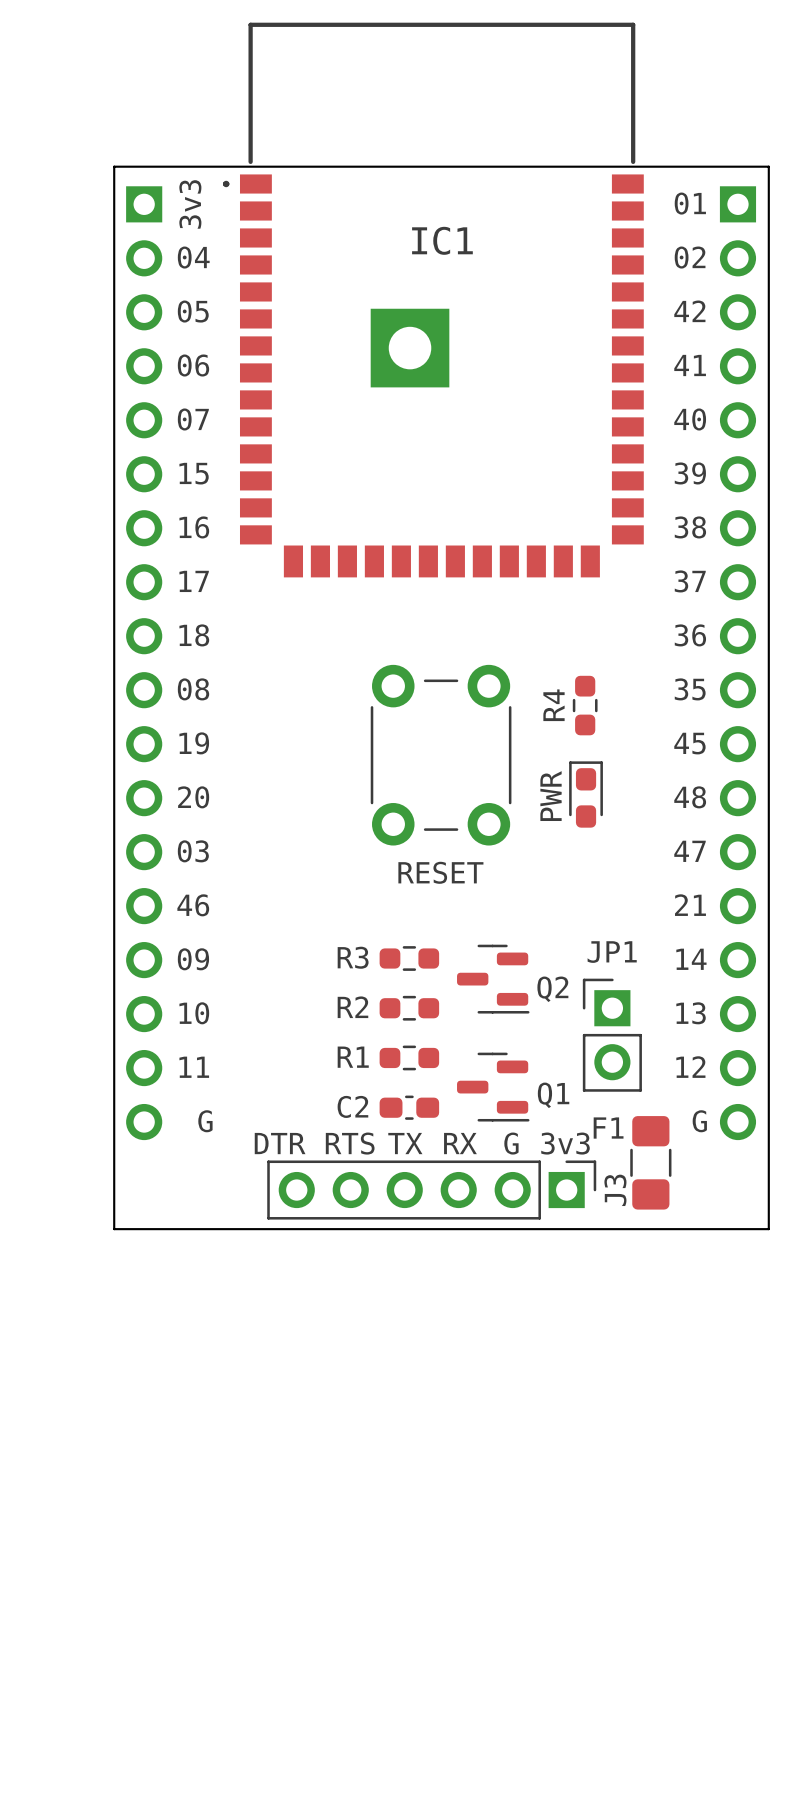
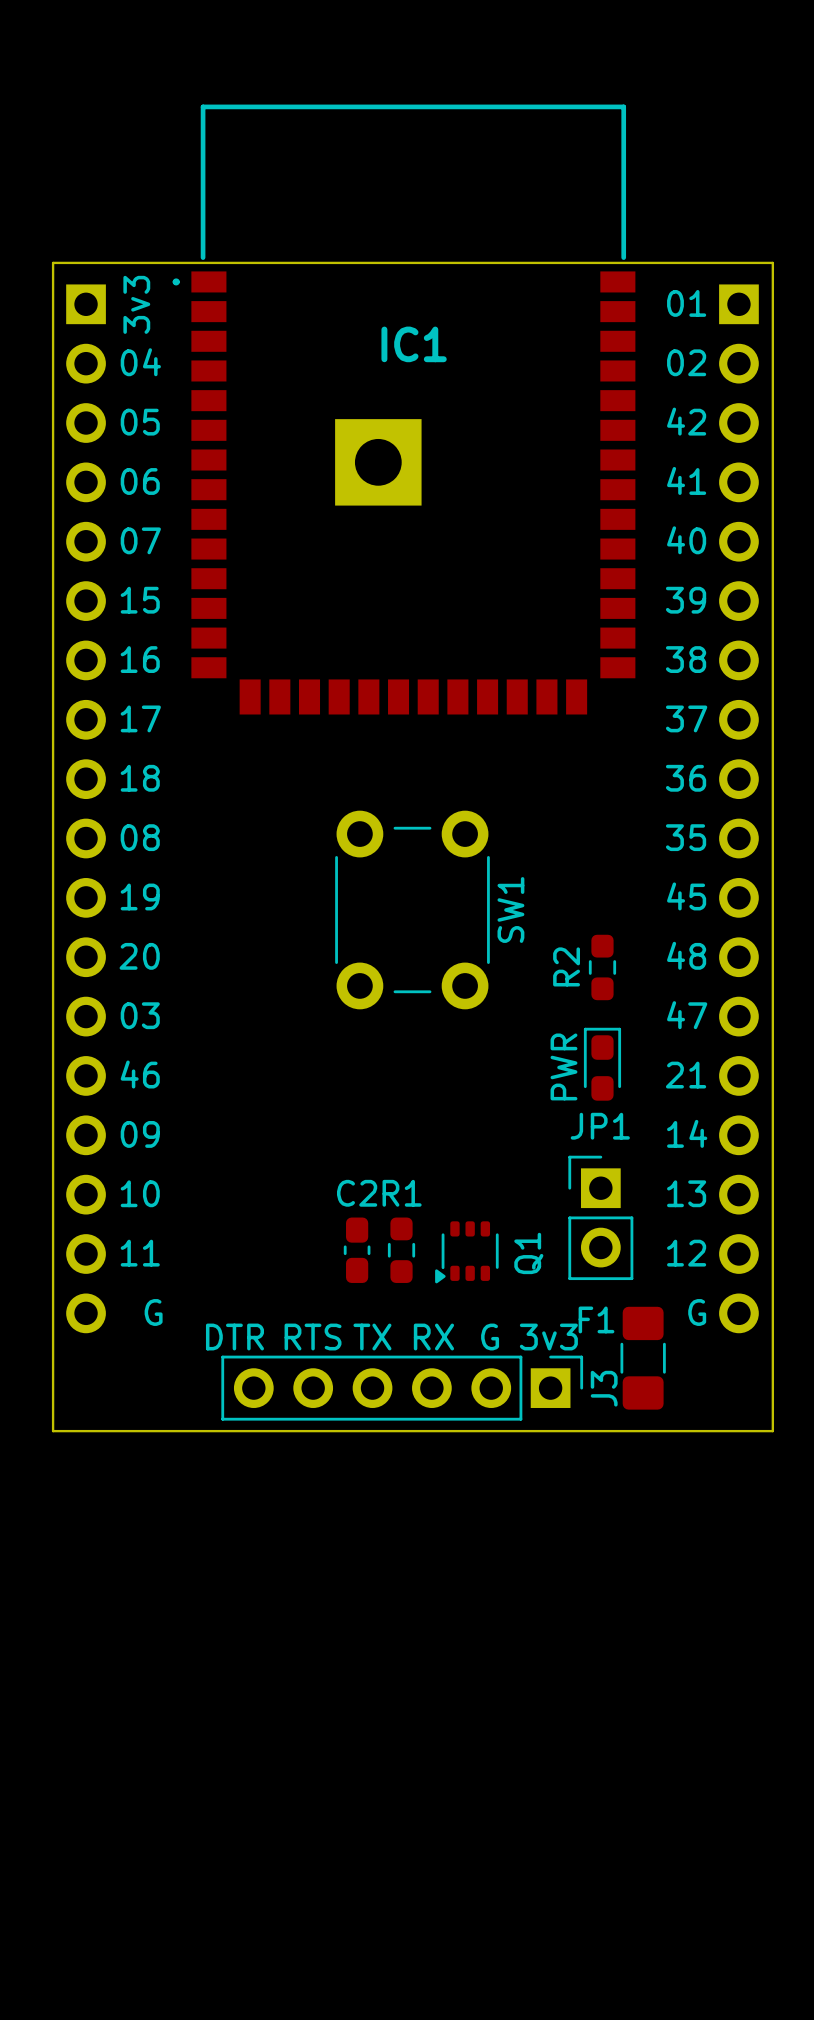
R4: (585, 705) -> none
part position: (586, 794) -> (602, 1064)
RESET name: RESET (440, 872) -> SW1 (510, 910)
R3: (409, 958) -> none
Q2: (493, 979) -> none
R2 rotation: 0° (409, 1008) -> 90° clockwise (602, 967)
R2 position: (409, 1008) -> (602, 967)
Q1 footprint: [457, 1052, 530, 1122] -> [435, 1221, 499, 1284]
R1 rotation: 0° (409, 1057) -> 90° clockwise (401, 1250)
C2 rotation: 0° (409, 1107) -> 90° clockwise (357, 1250)
C2 position: (409, 1107) -> (357, 1250)

